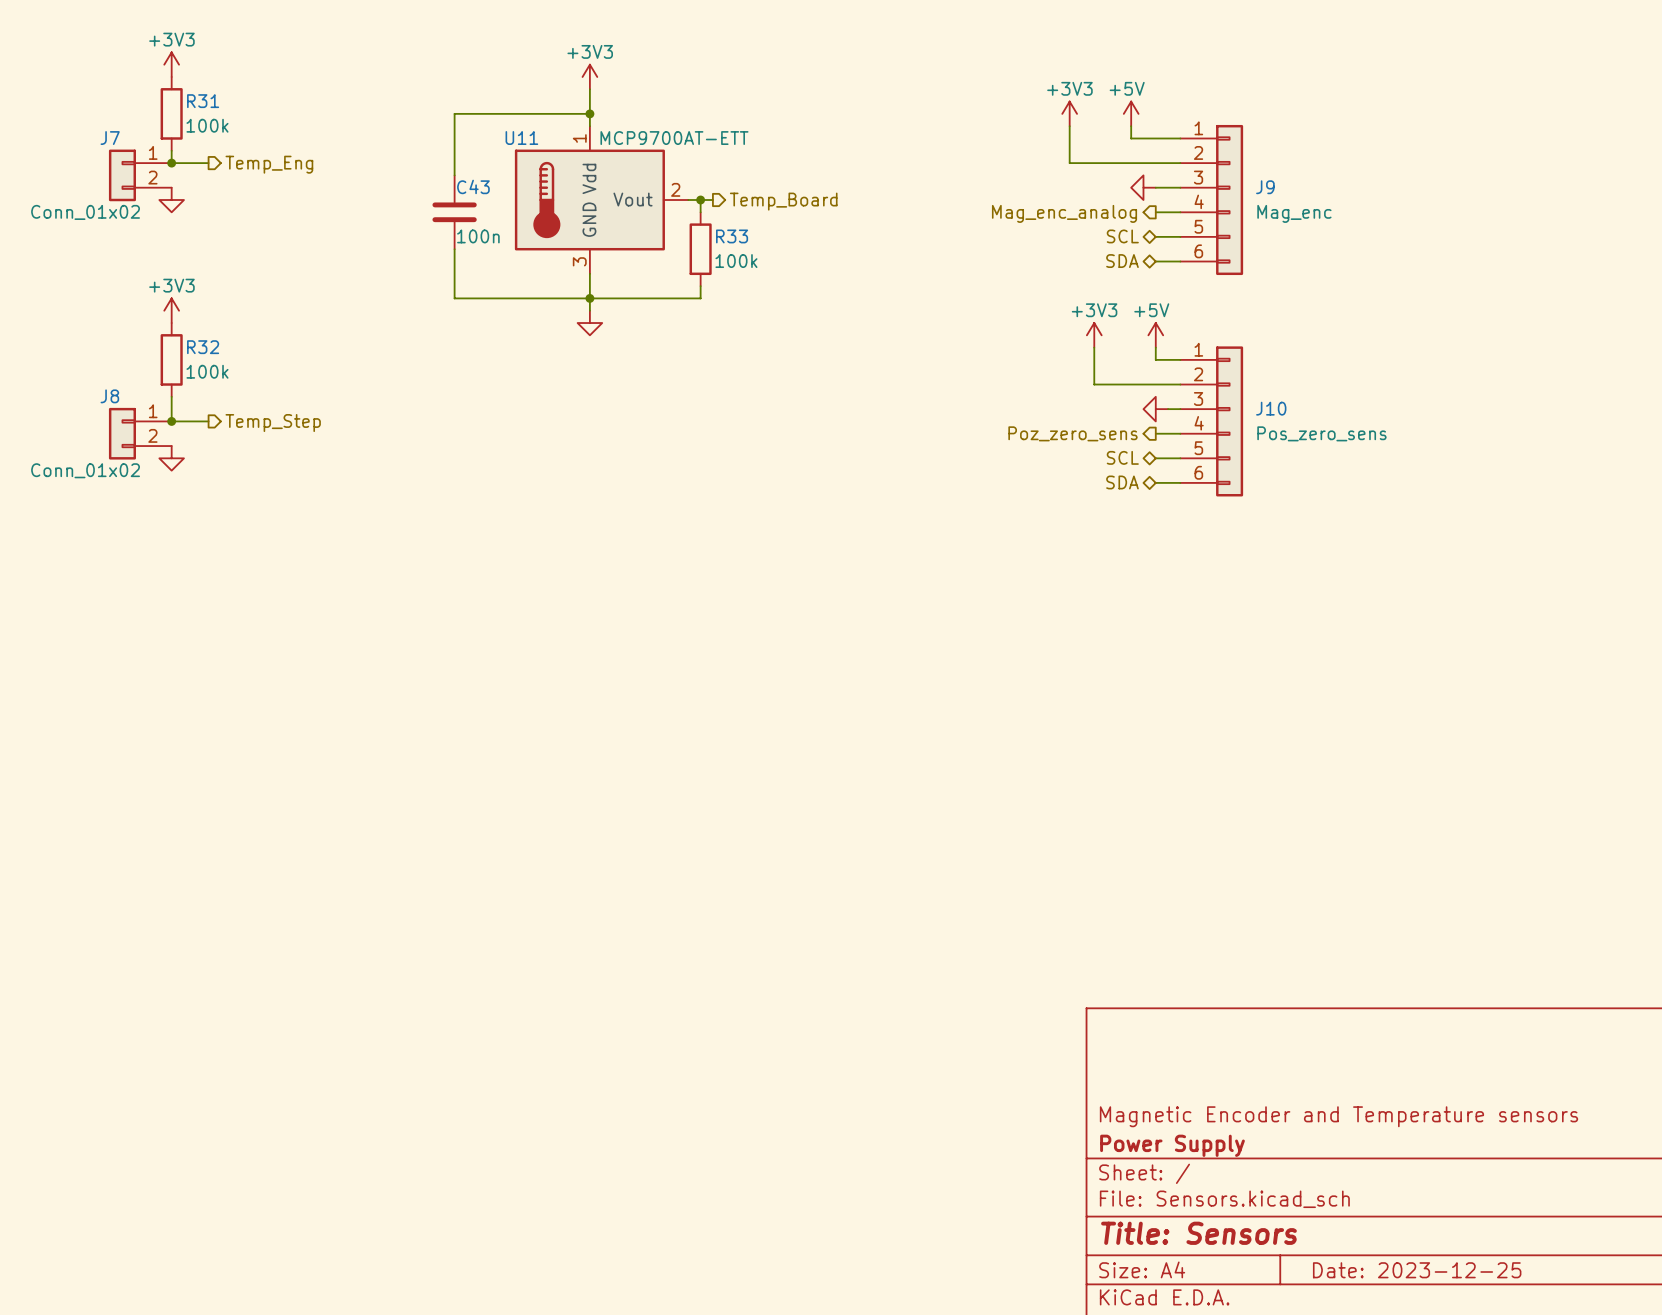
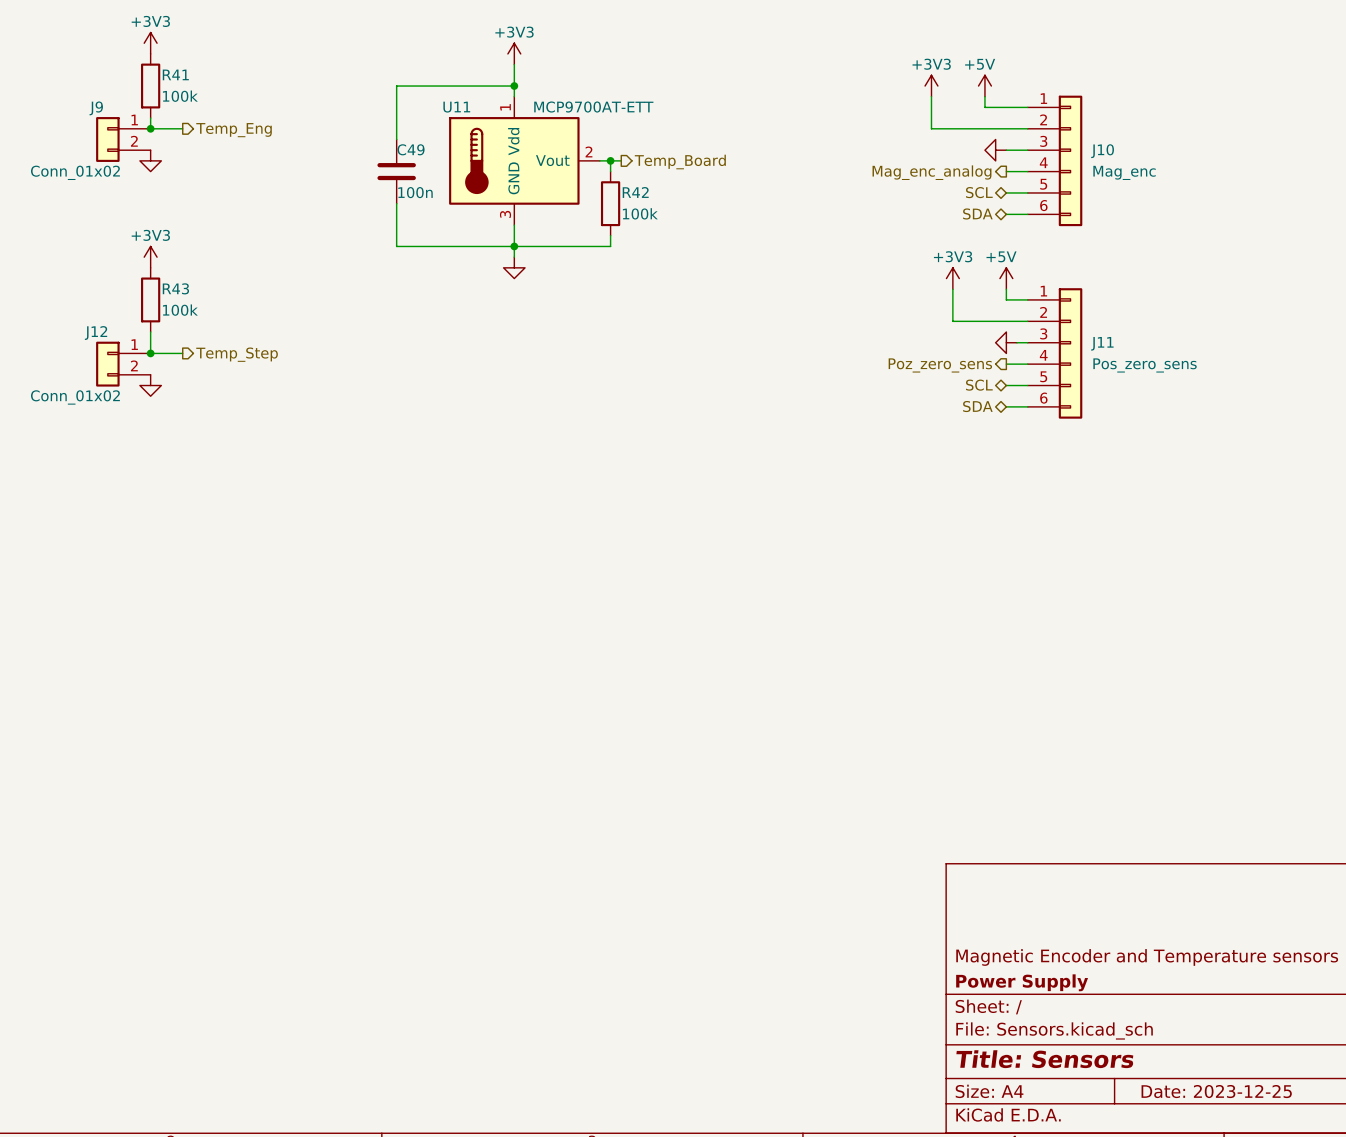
R31 name: R31 (203, 101) -> R41 (175, 74)
J7 name: J7 (110, 138) -> J9 (96, 108)
C43 name: C43 (473, 186) -> C49 (411, 149)
J9 name: J9 (1265, 187) -> J10 (1102, 151)
R33 name: R33 (732, 236) -> R42 (635, 192)
R32 name: R32 (203, 347) -> R43 (175, 288)
J8 name: J8 (109, 396) -> J12 (96, 333)
J10 name: J10 (1271, 408) -> J11 (1102, 343)

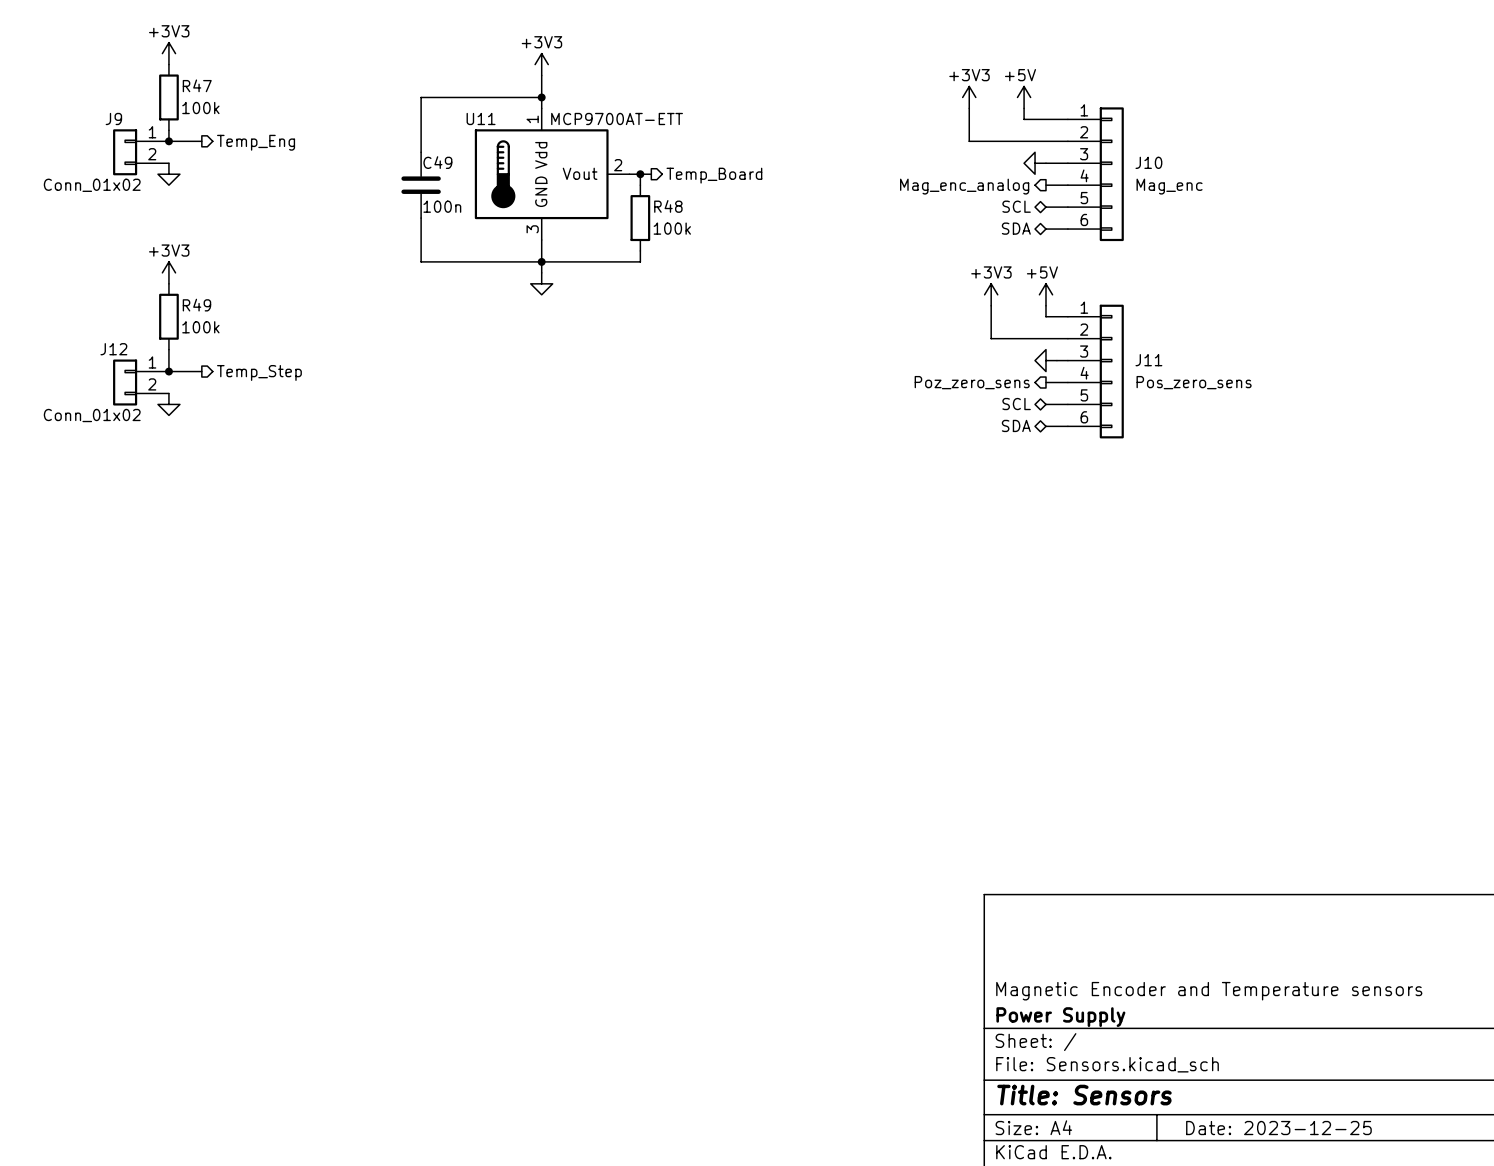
R41 name: R41 (175, 74) -> R47 (197, 85)
R42 name: R42 (635, 192) -> R48 (668, 206)
R43 name: R43 (175, 288) -> R49 (196, 305)

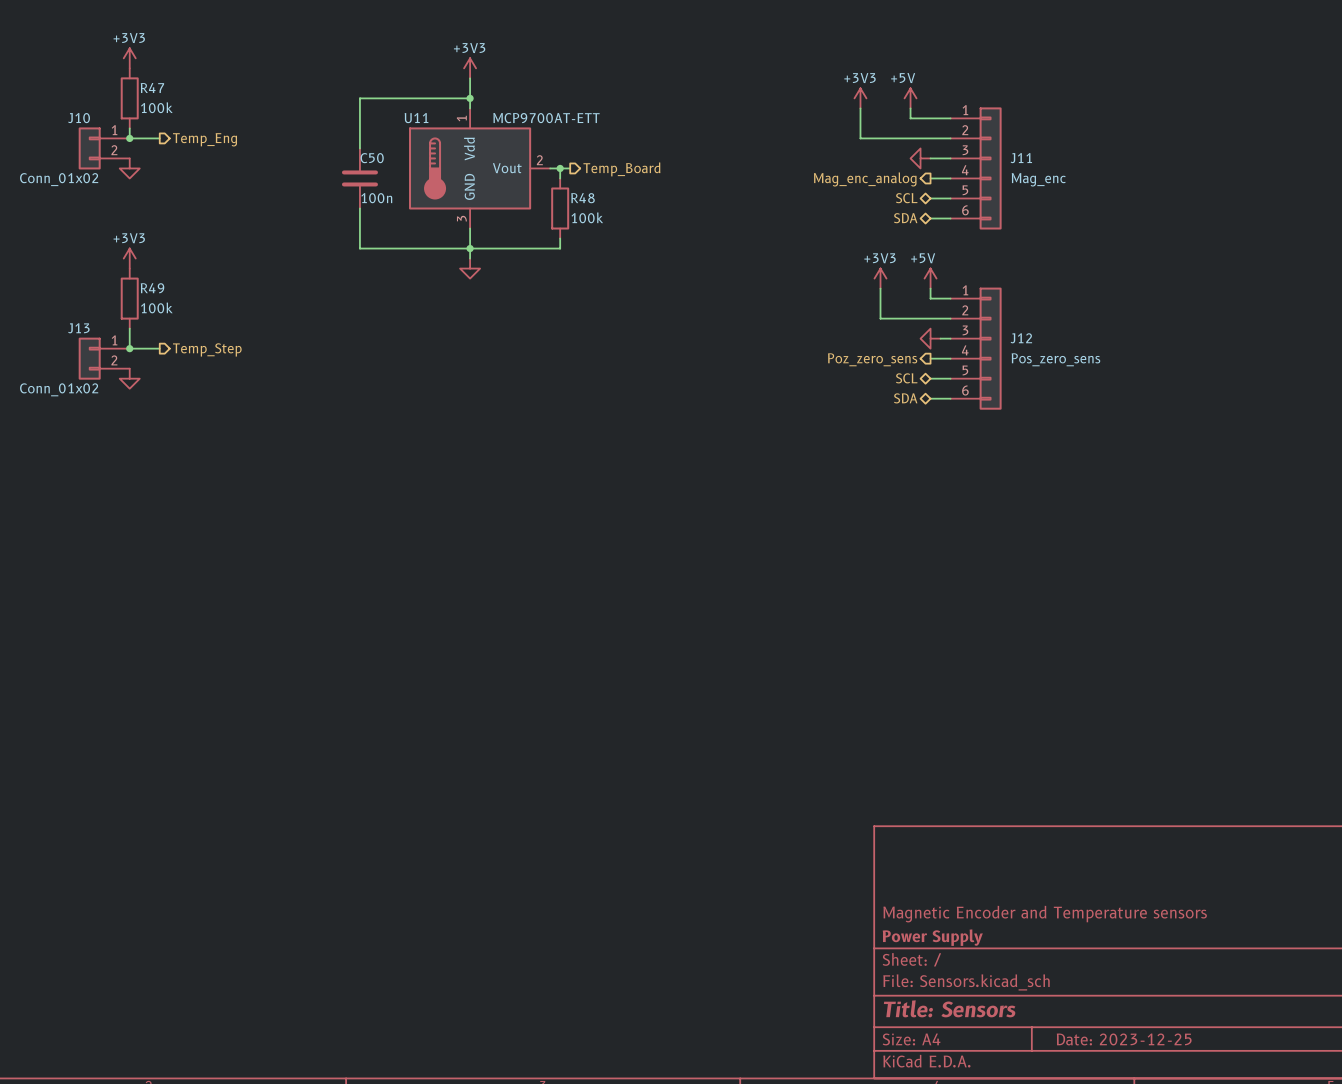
J9 name: J9 (113, 118) -> J10 (79, 118)
C49 name: C49 (437, 162) -> C50 (372, 158)
J10 name: J10 (1148, 162) -> J11 (1021, 158)
J12 name: J12 (113, 349) -> J13 (78, 328)
J11 name: J11 (1148, 360) -> J12 (1021, 338)

